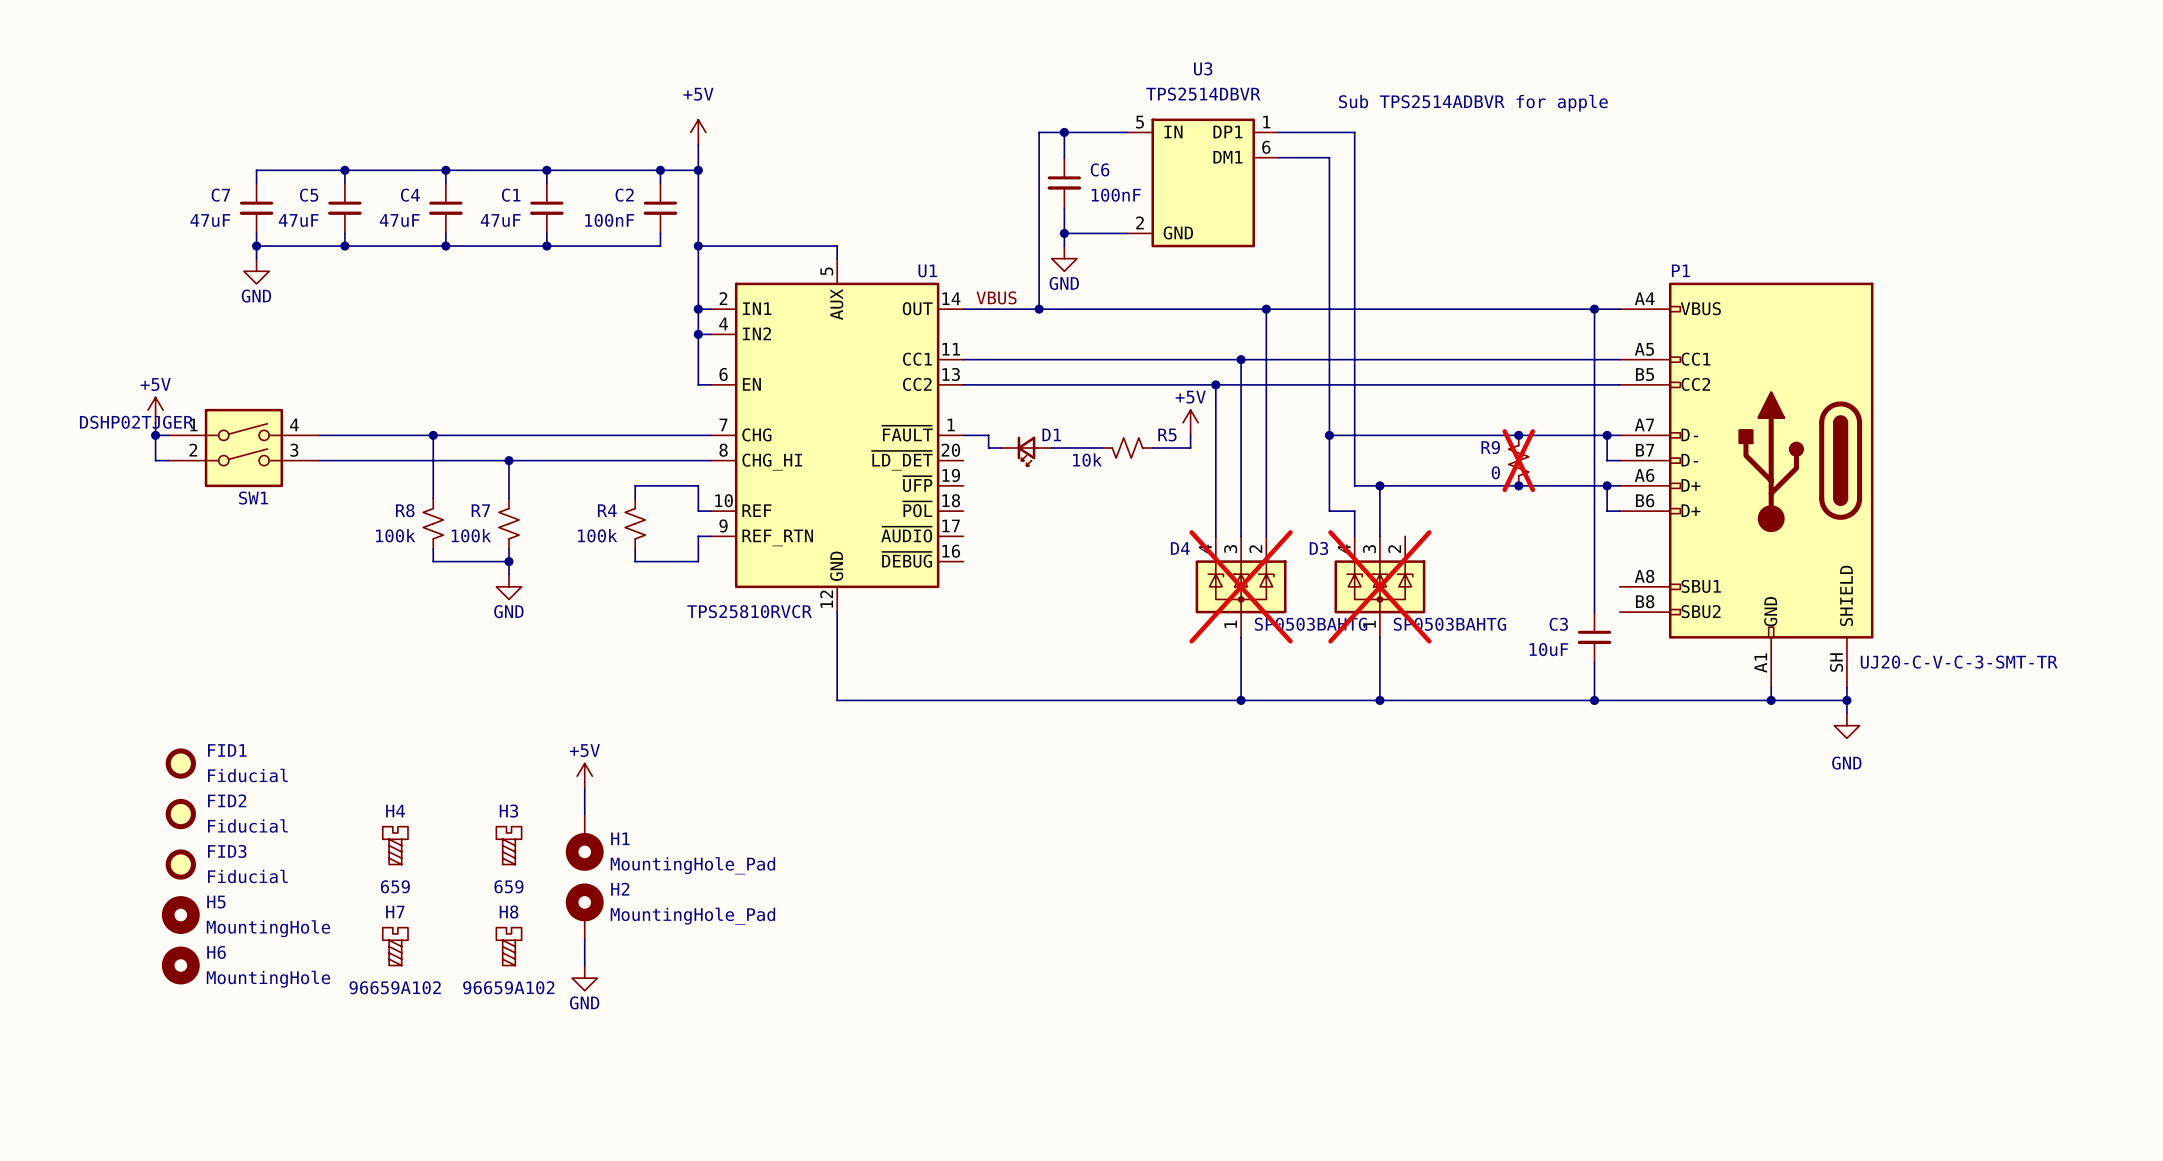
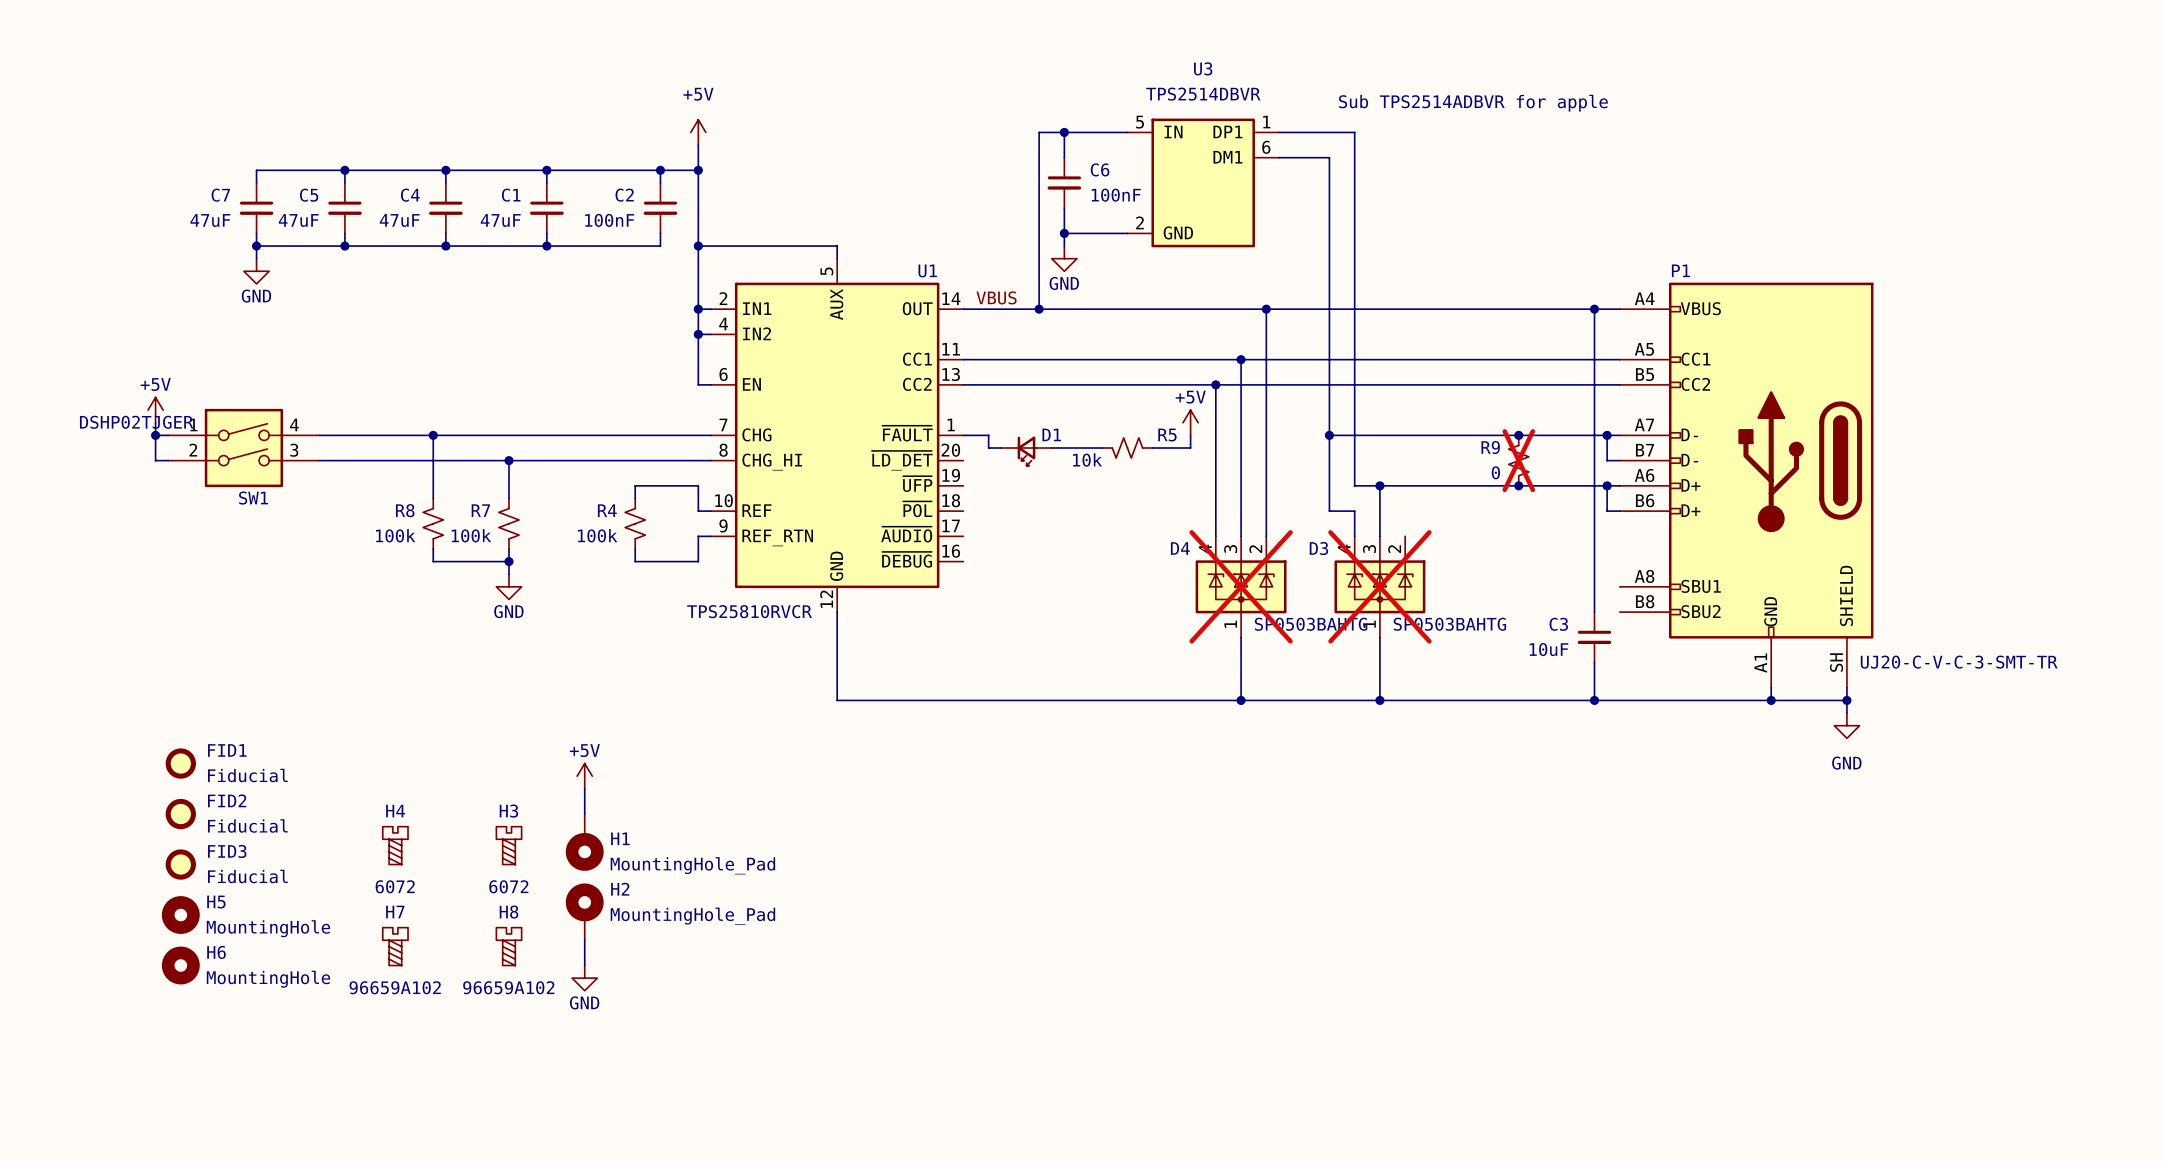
H4 value: 659 (395, 886) -> 6072 (395, 886)
H3 value: 659 (508, 886) -> 6072 (508, 886)

